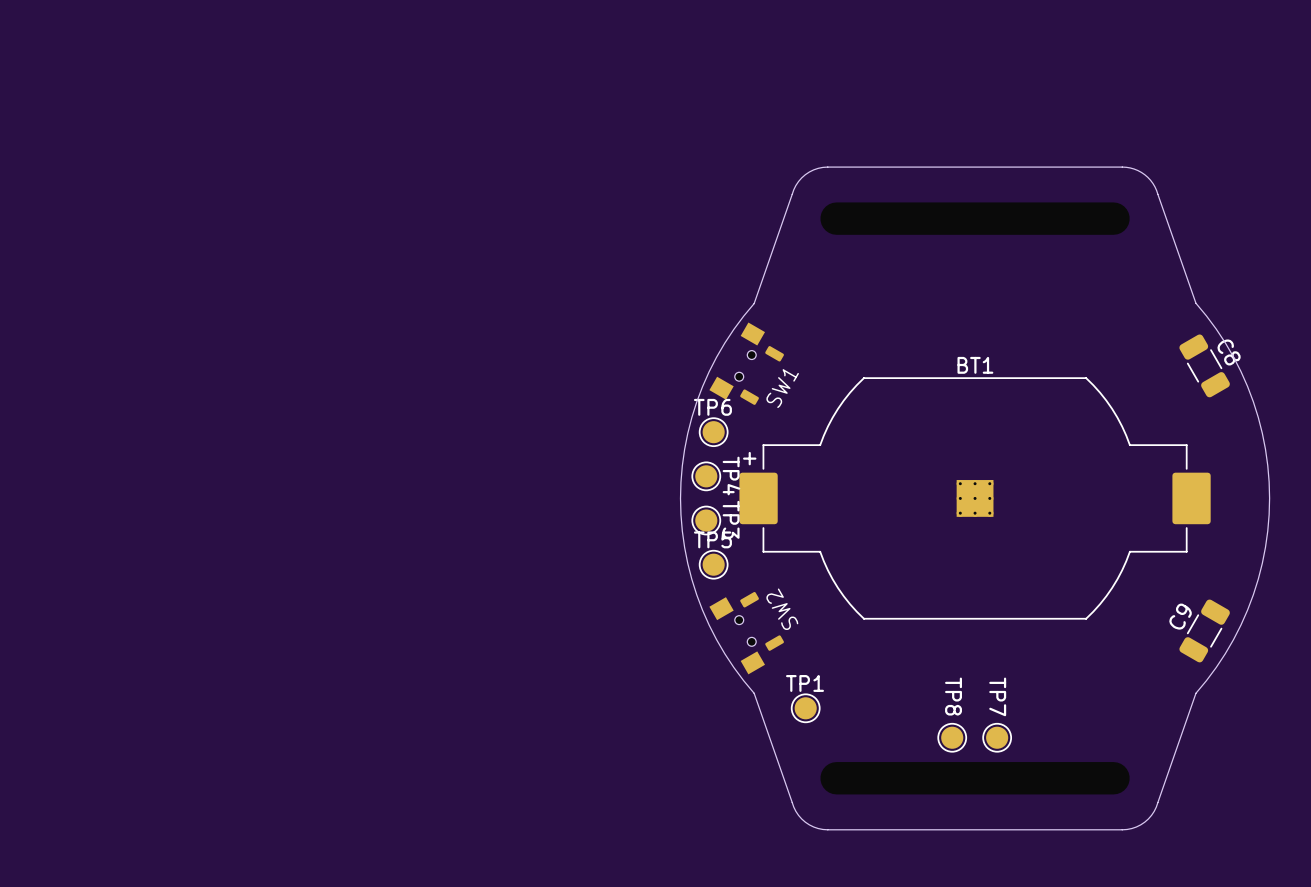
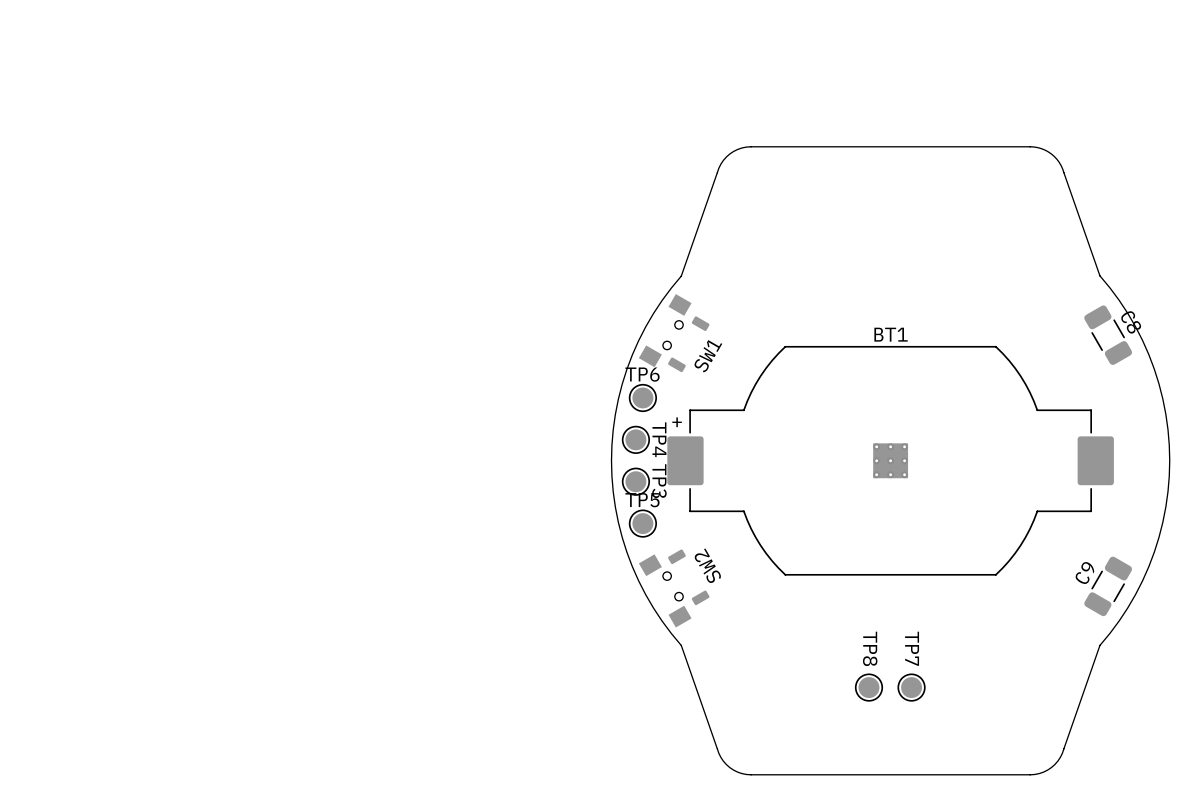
TP1: (805, 708) -> none

